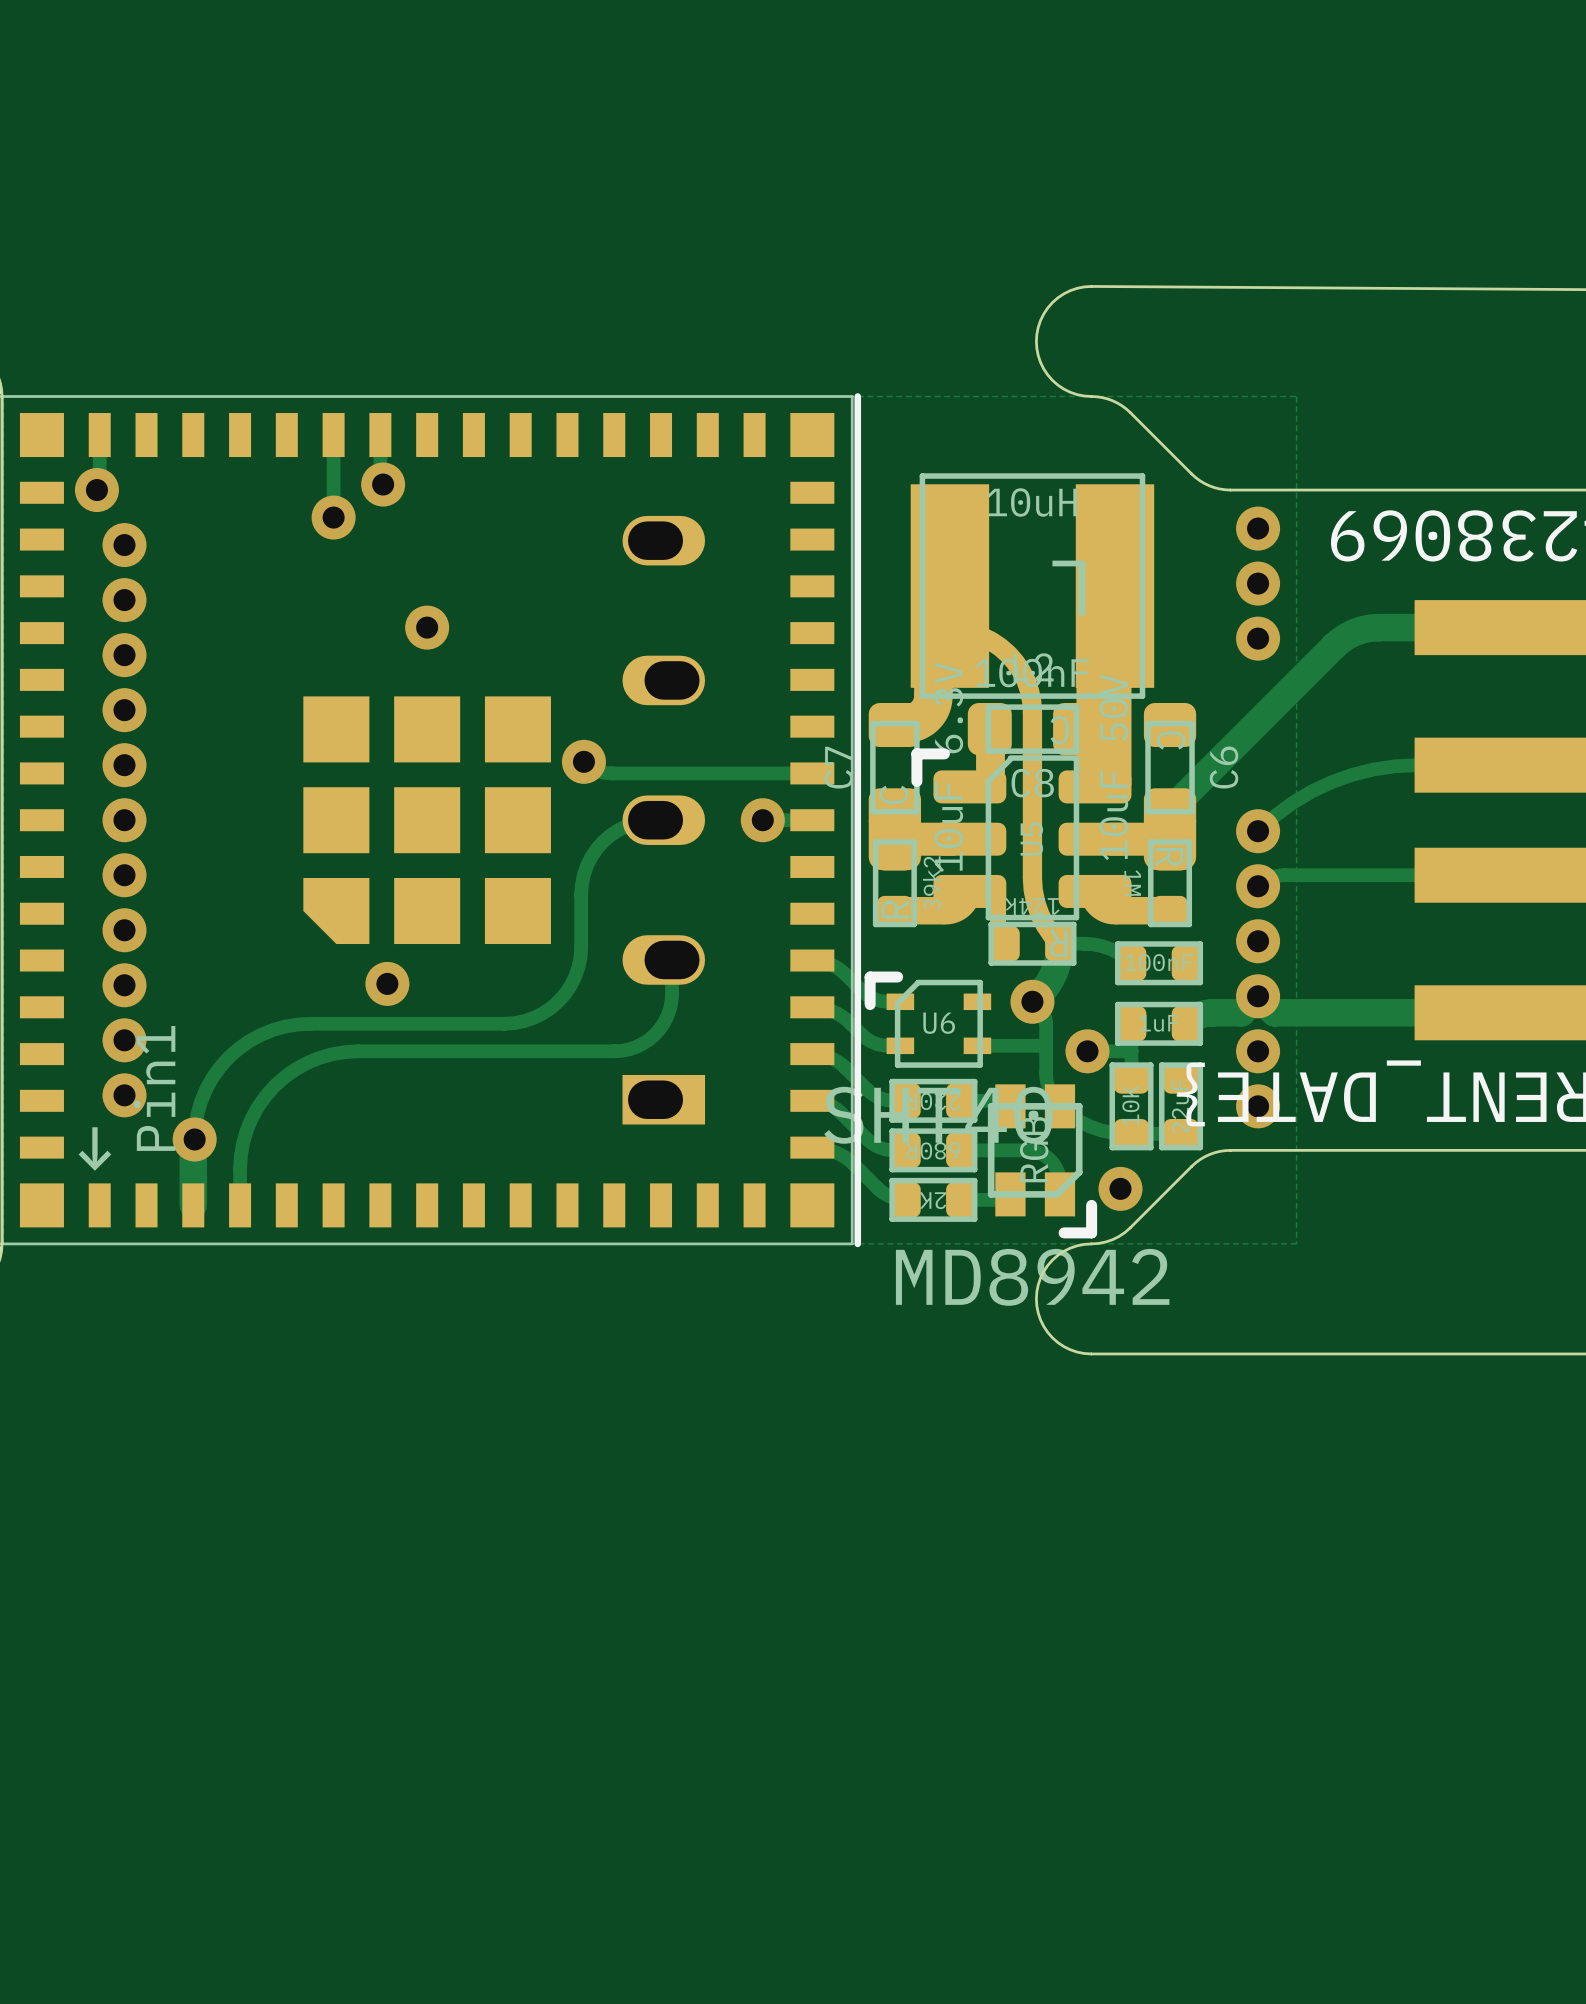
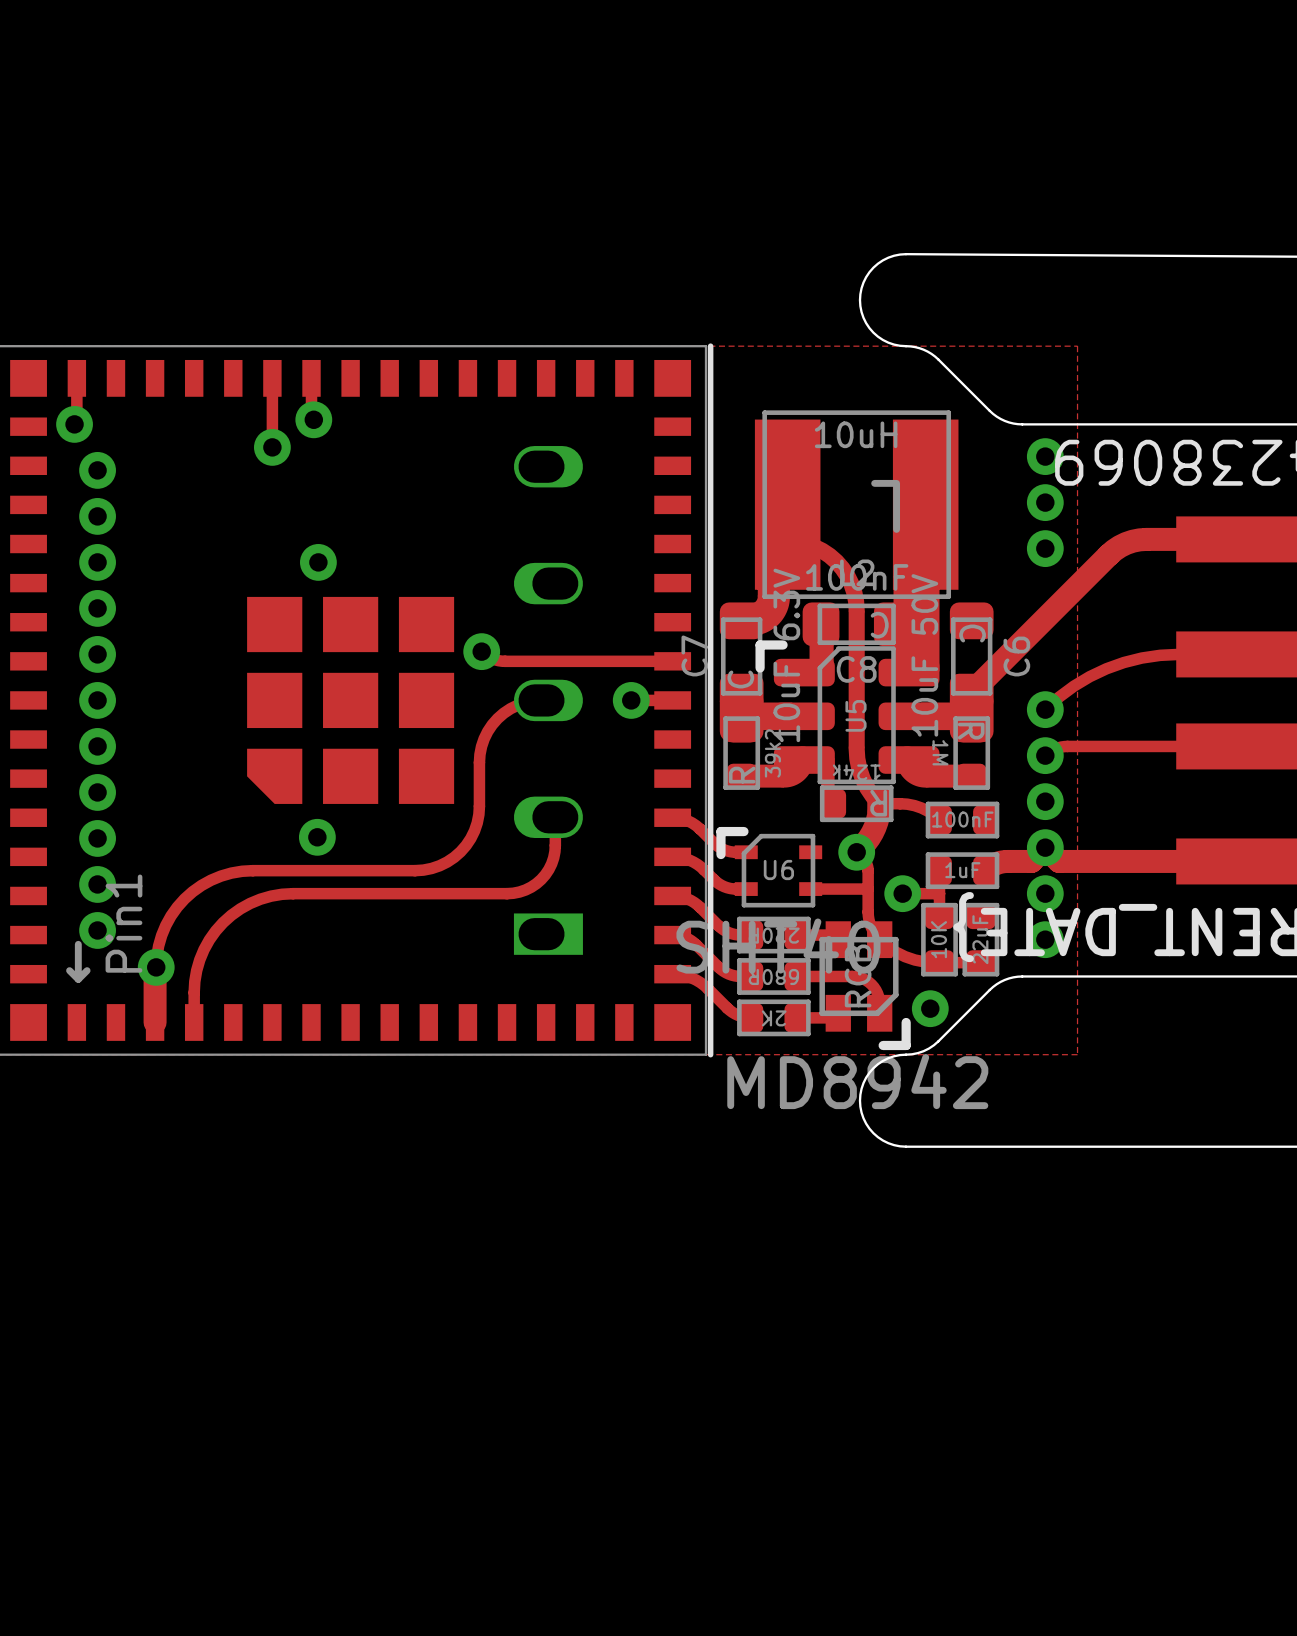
via position: (427, 627) -> (318, 562)

